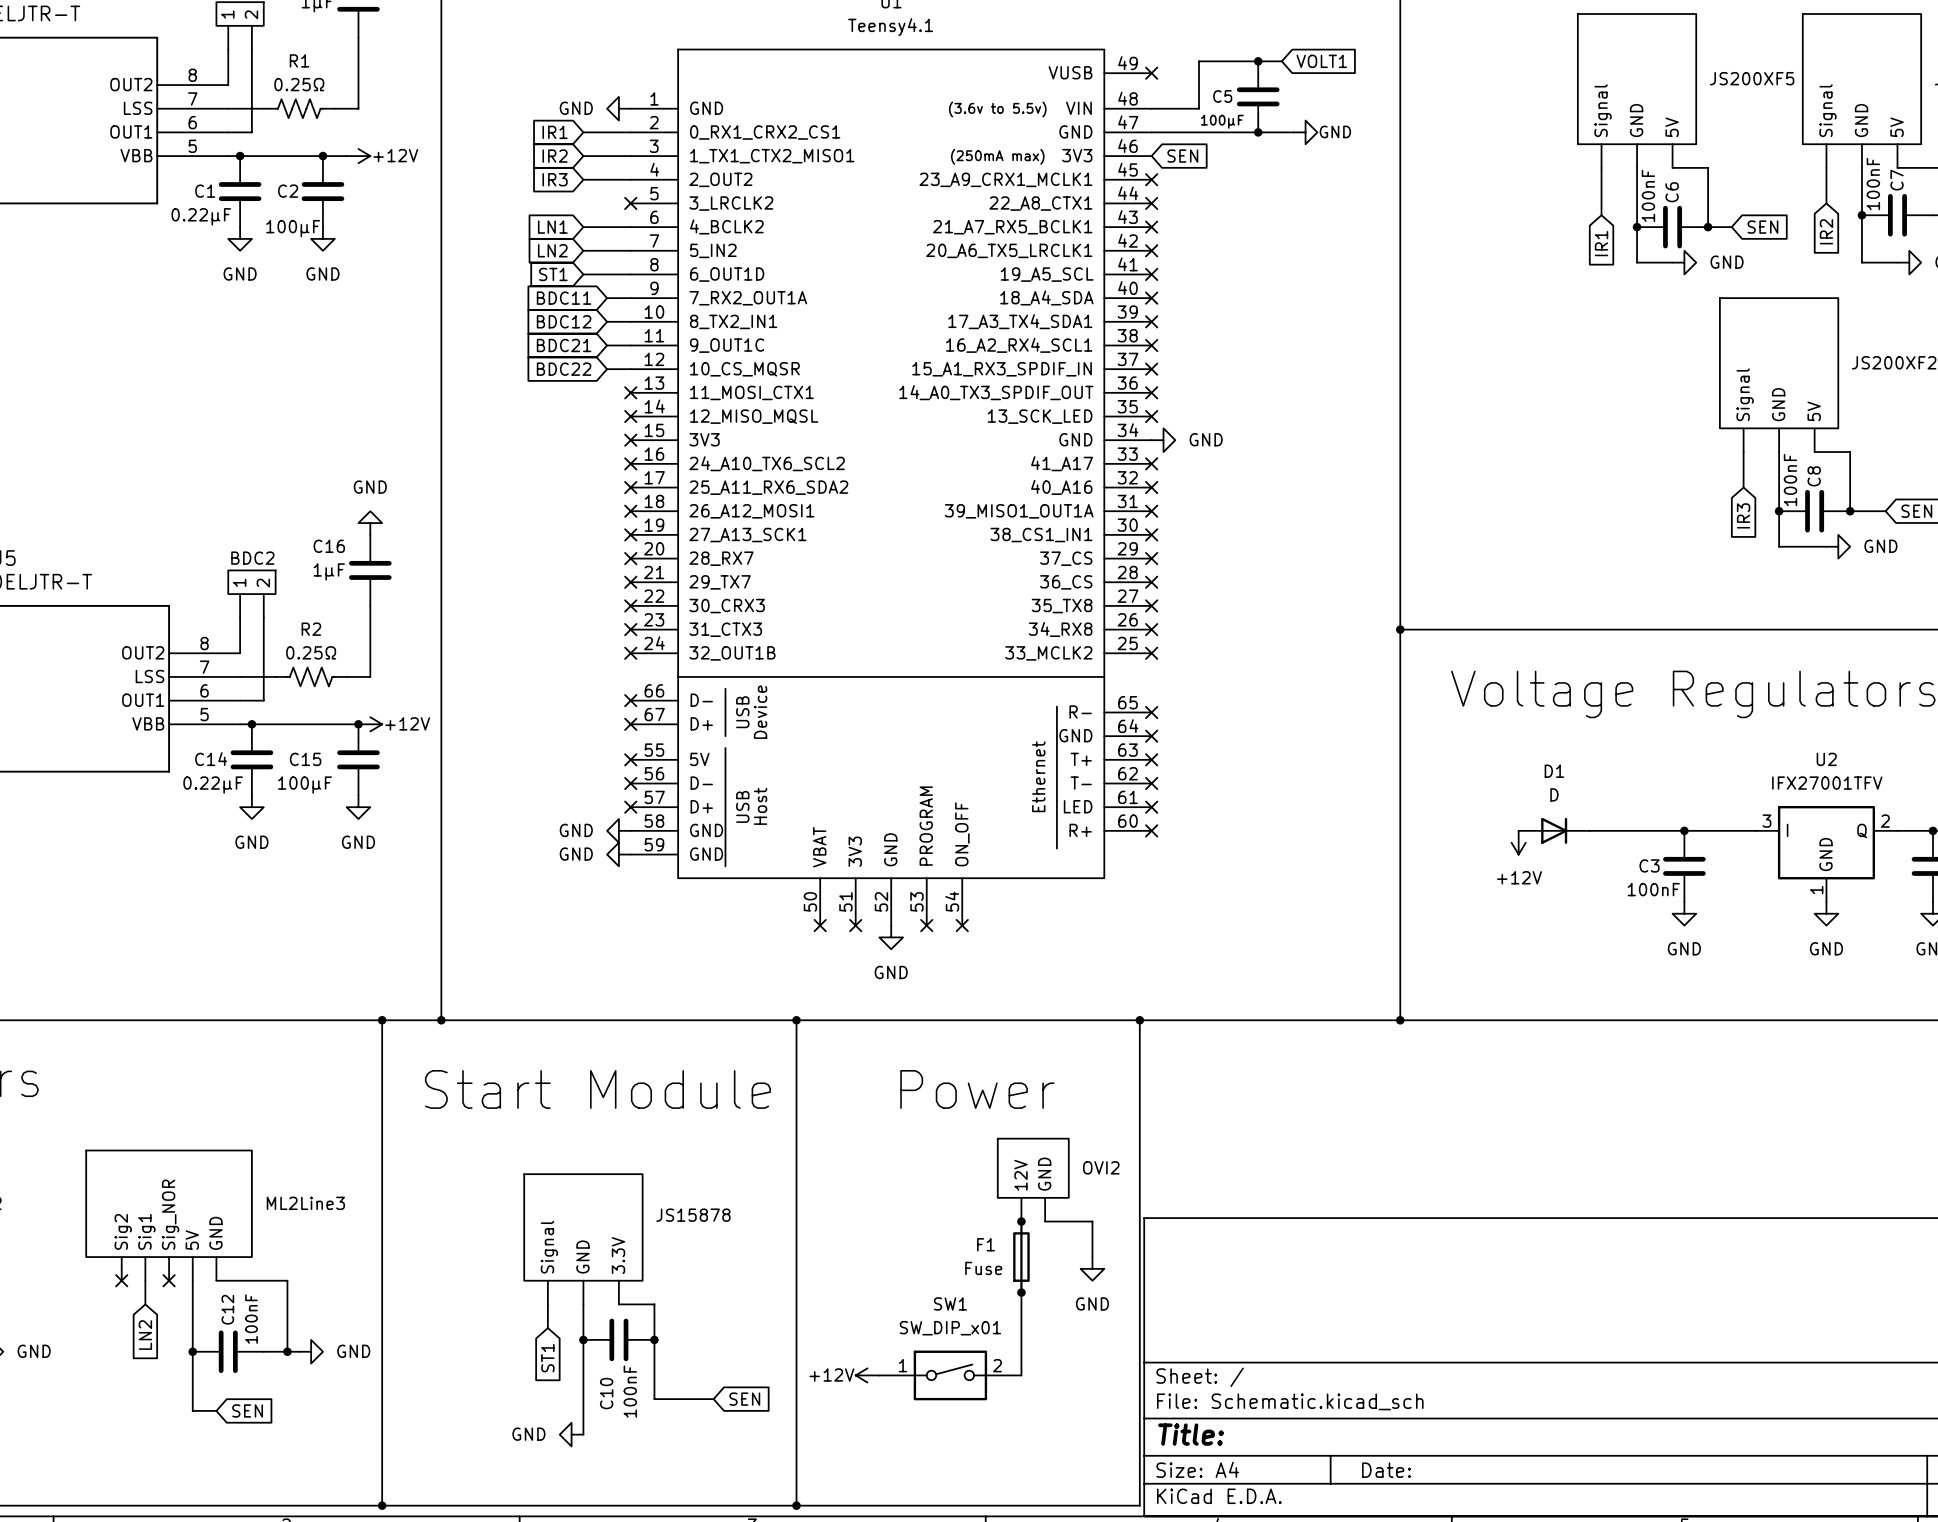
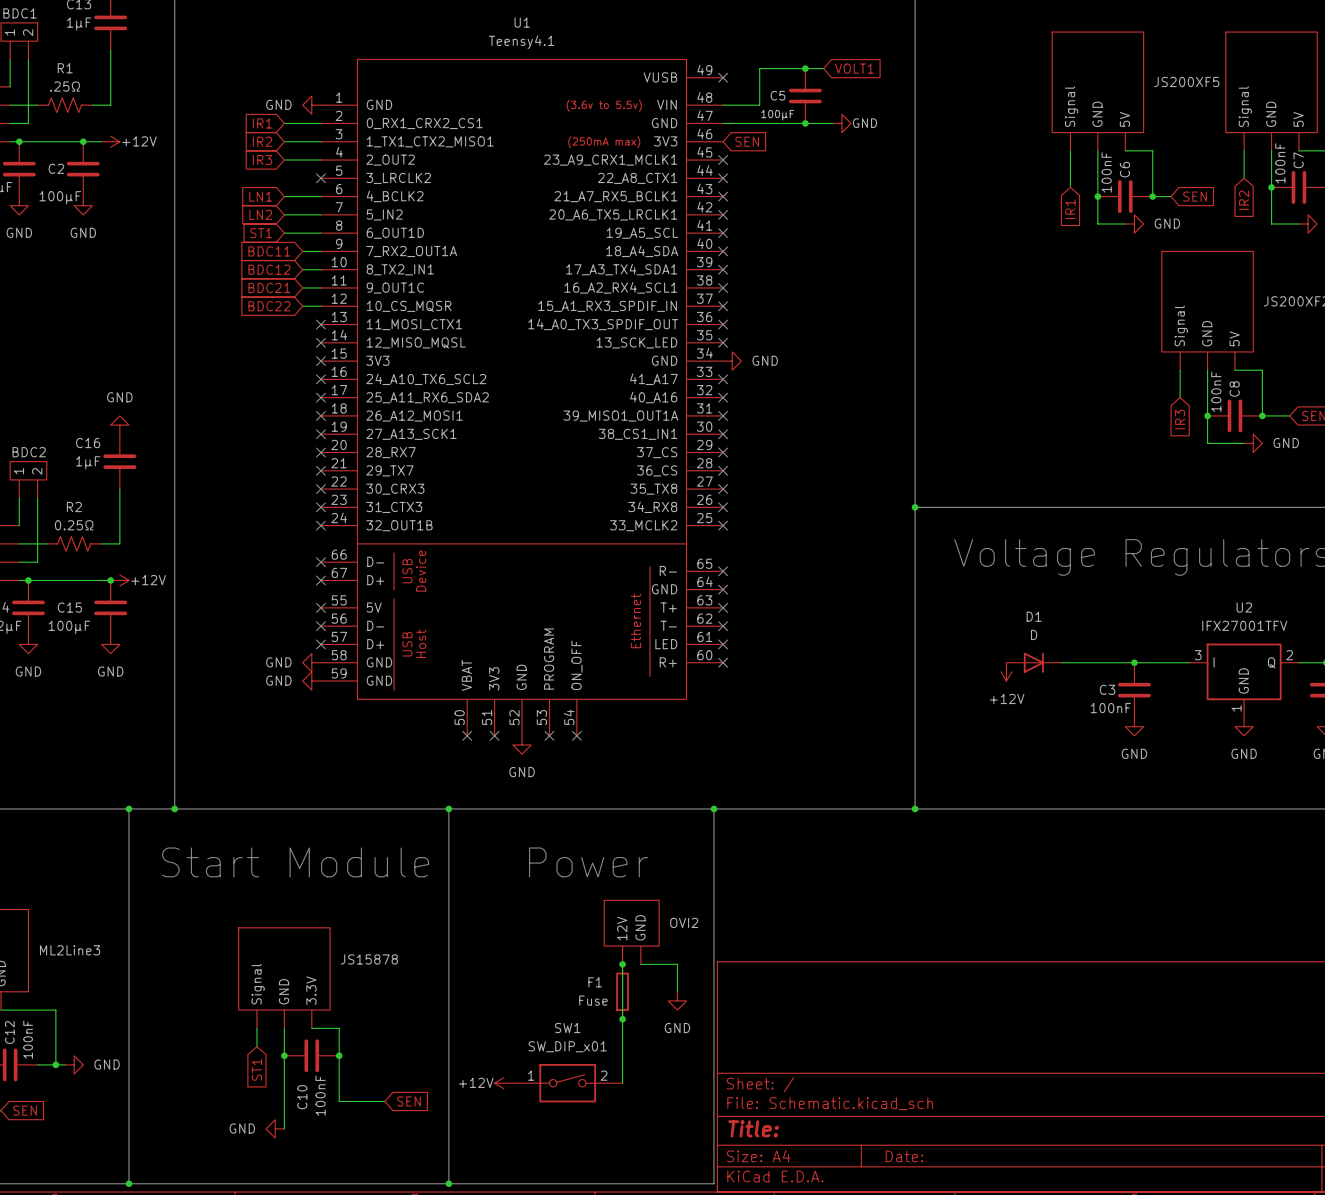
R1 value: 0.25Ω (299, 84) -> .25Ω (65, 86)

